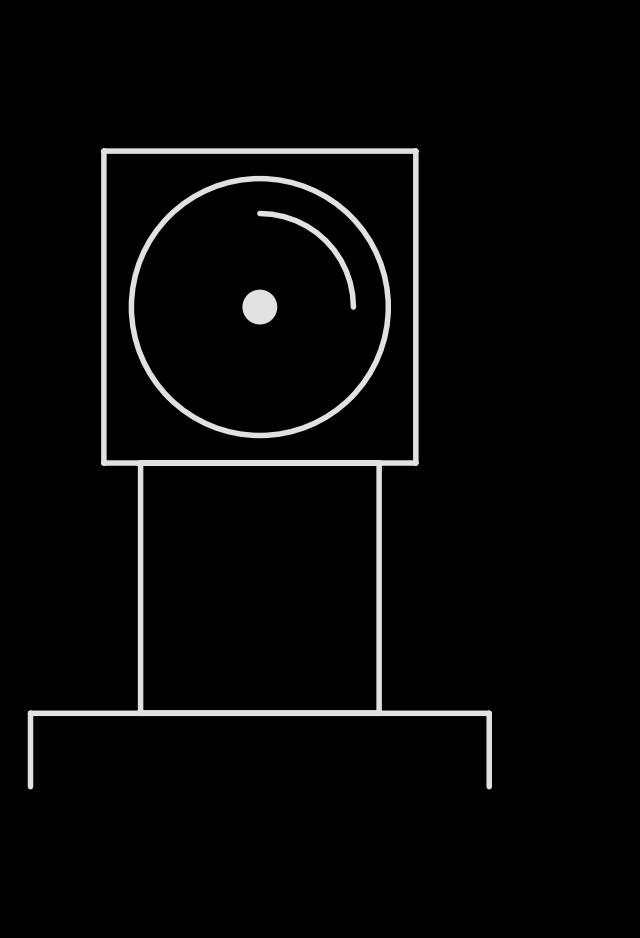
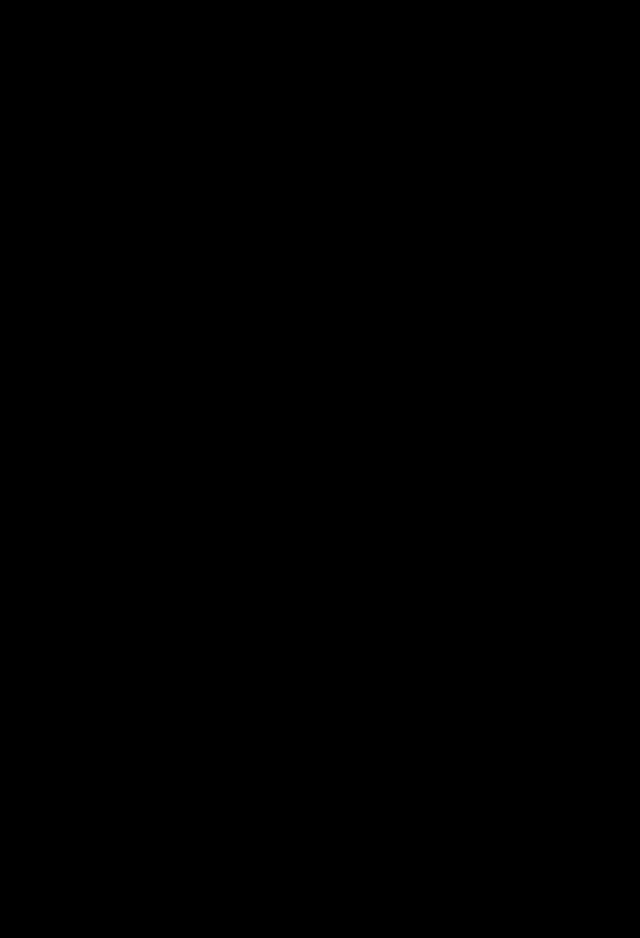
line: (103, 151) (415, 151) (415, 463) (103, 463) (103, 151) -> none
drawing: [128, 175, 392, 439] -> none
line: (259, 213) (272, 214) (295, 220) (316, 232) (326, 240) (340, 260) (346, 271) (350, 282) (353, 307) -> none
line: (140, 463) (140, 713) -> none
line: (379, 463) (379, 713) -> none
line: (30, 786) (30, 713) (489, 713) (489, 786) -> none

